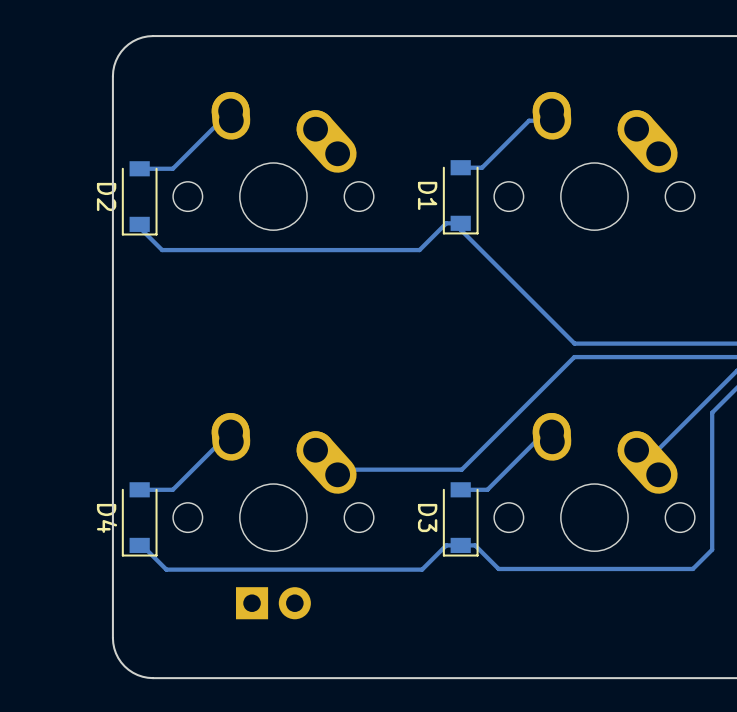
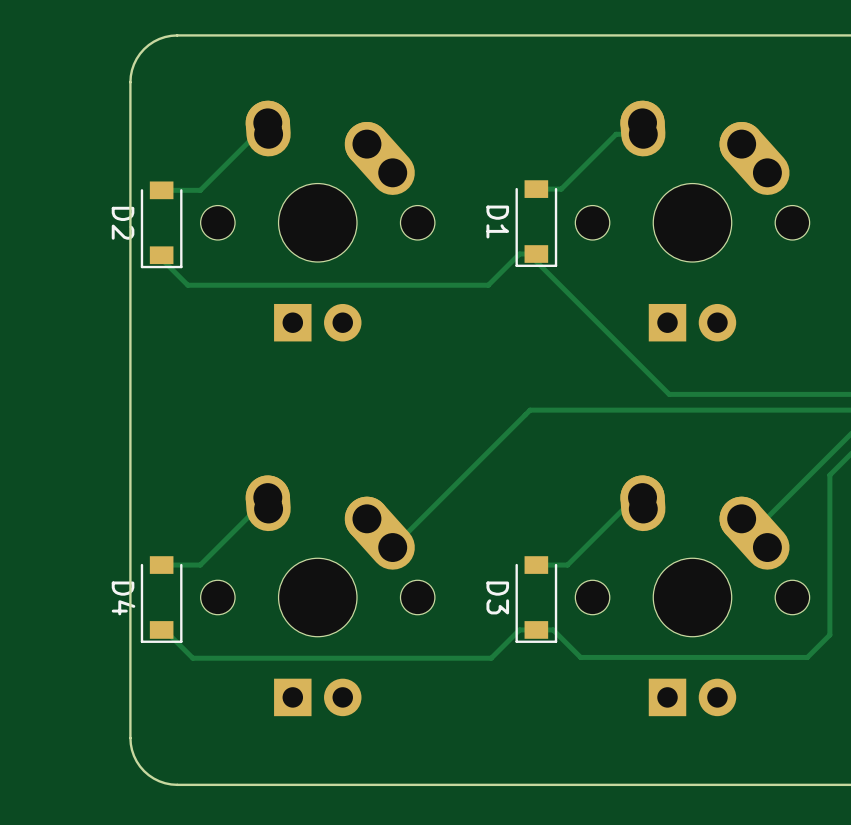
part: none -> (317, 221)
part: none -> (692, 221)
track: (574, 357) (461, 469) (342, 469) -> (669, 410) (530, 410) (398, 541)
part: none -> (692, 595)

